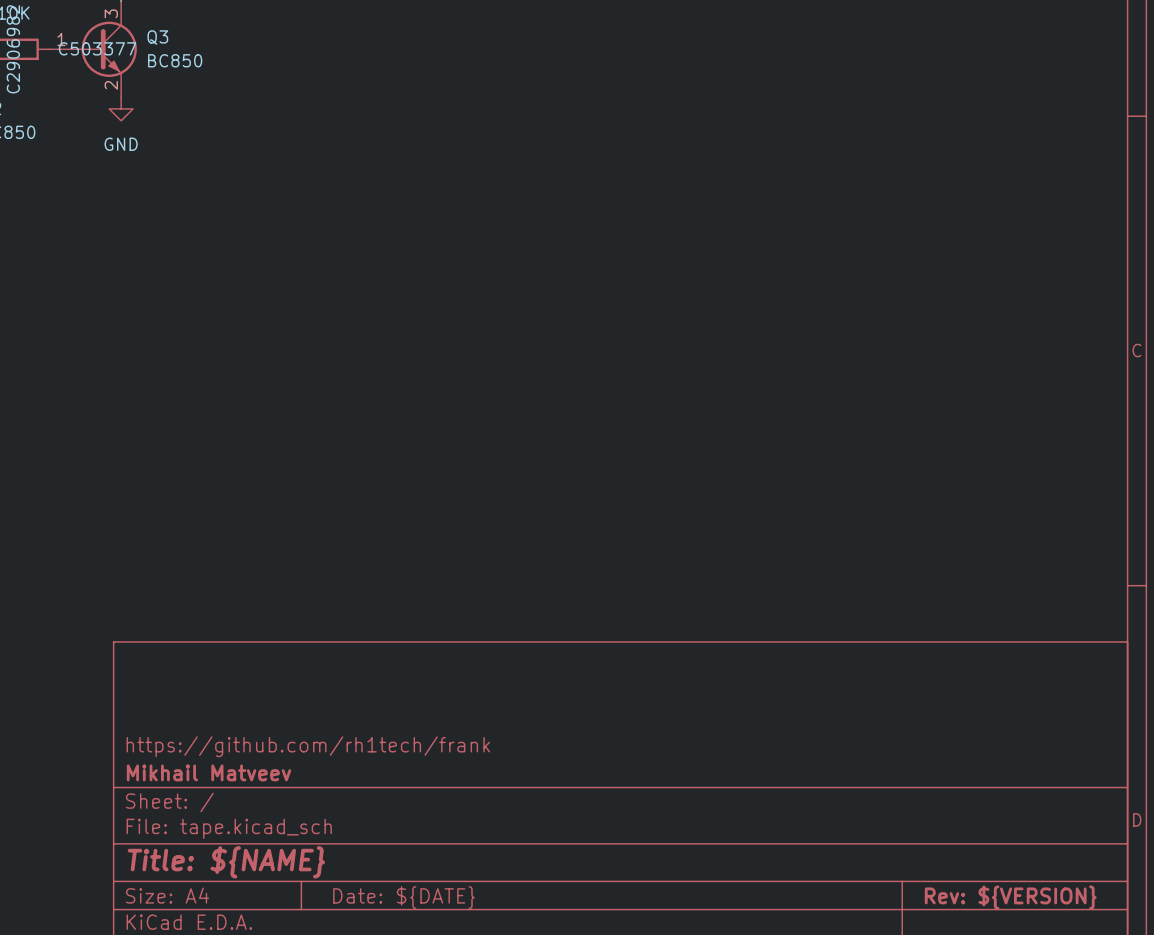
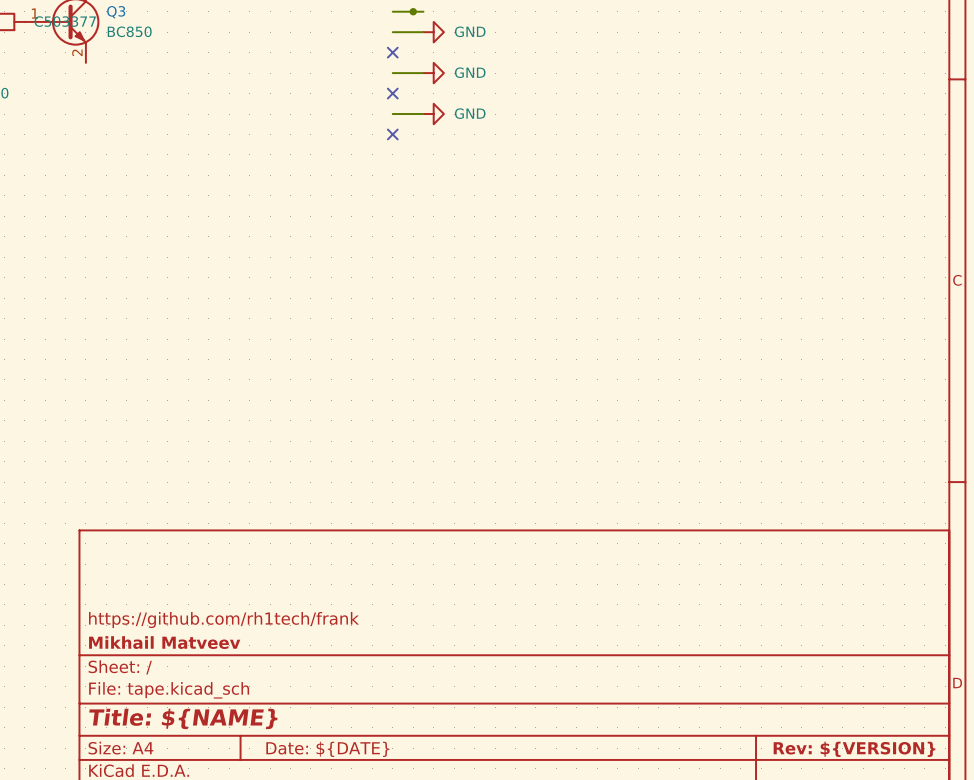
wire: none -> (392, 11) (423, 11)
junction: none -> (413, 11)
wire: none -> (392, 32) (423, 32)
power symbol: none -> GND (433, 32)
no-connect mark: none -> (392, 52)
power symbol: GND (121, 108) -> none
wire: none -> (392, 73) (423, 73)
power symbol: none -> GND (433, 73)
no-connect mark: none -> (392, 93)
wire: none -> (392, 114) (423, 114)
power symbol: none -> GND (433, 114)
no-connect mark: none -> (392, 134)

